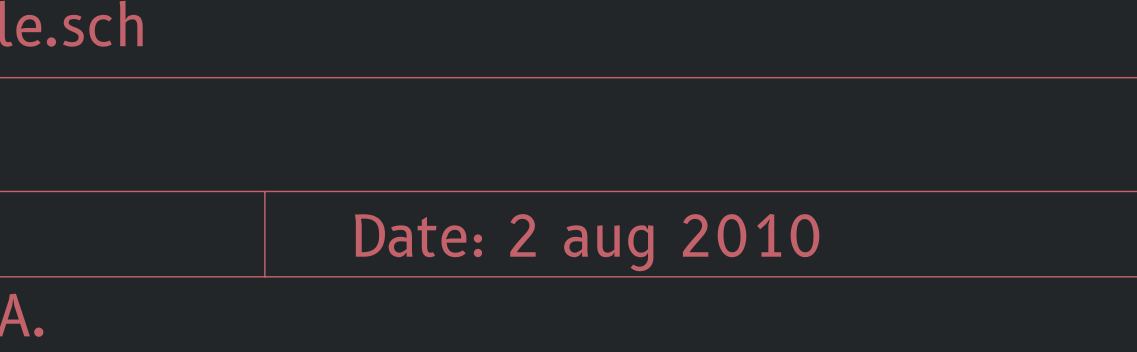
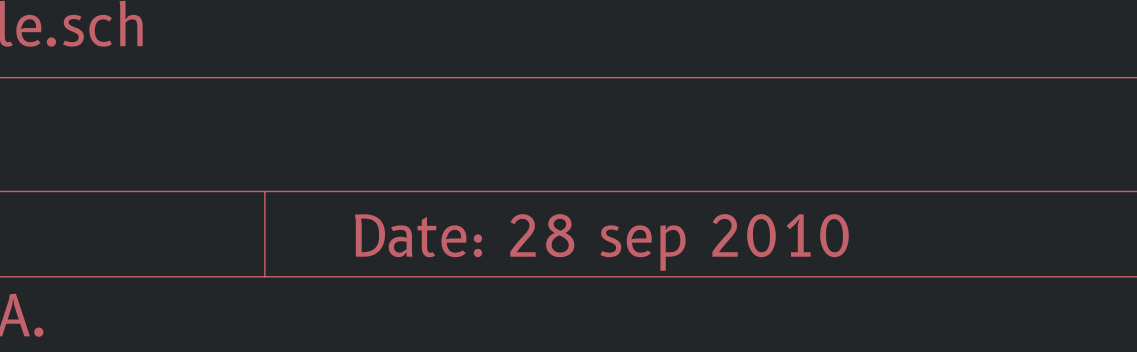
title block: Date: 2 aug 2010 (587, 242) -> Date: 28 sep 2010 (601, 242)

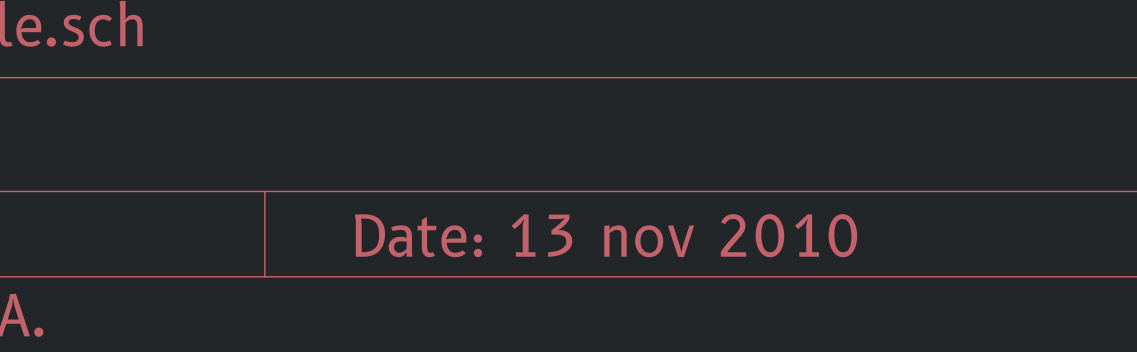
title block: Date: 28 sep 2010 (601, 242) -> Date: 13 nov 2010 (606, 235)

